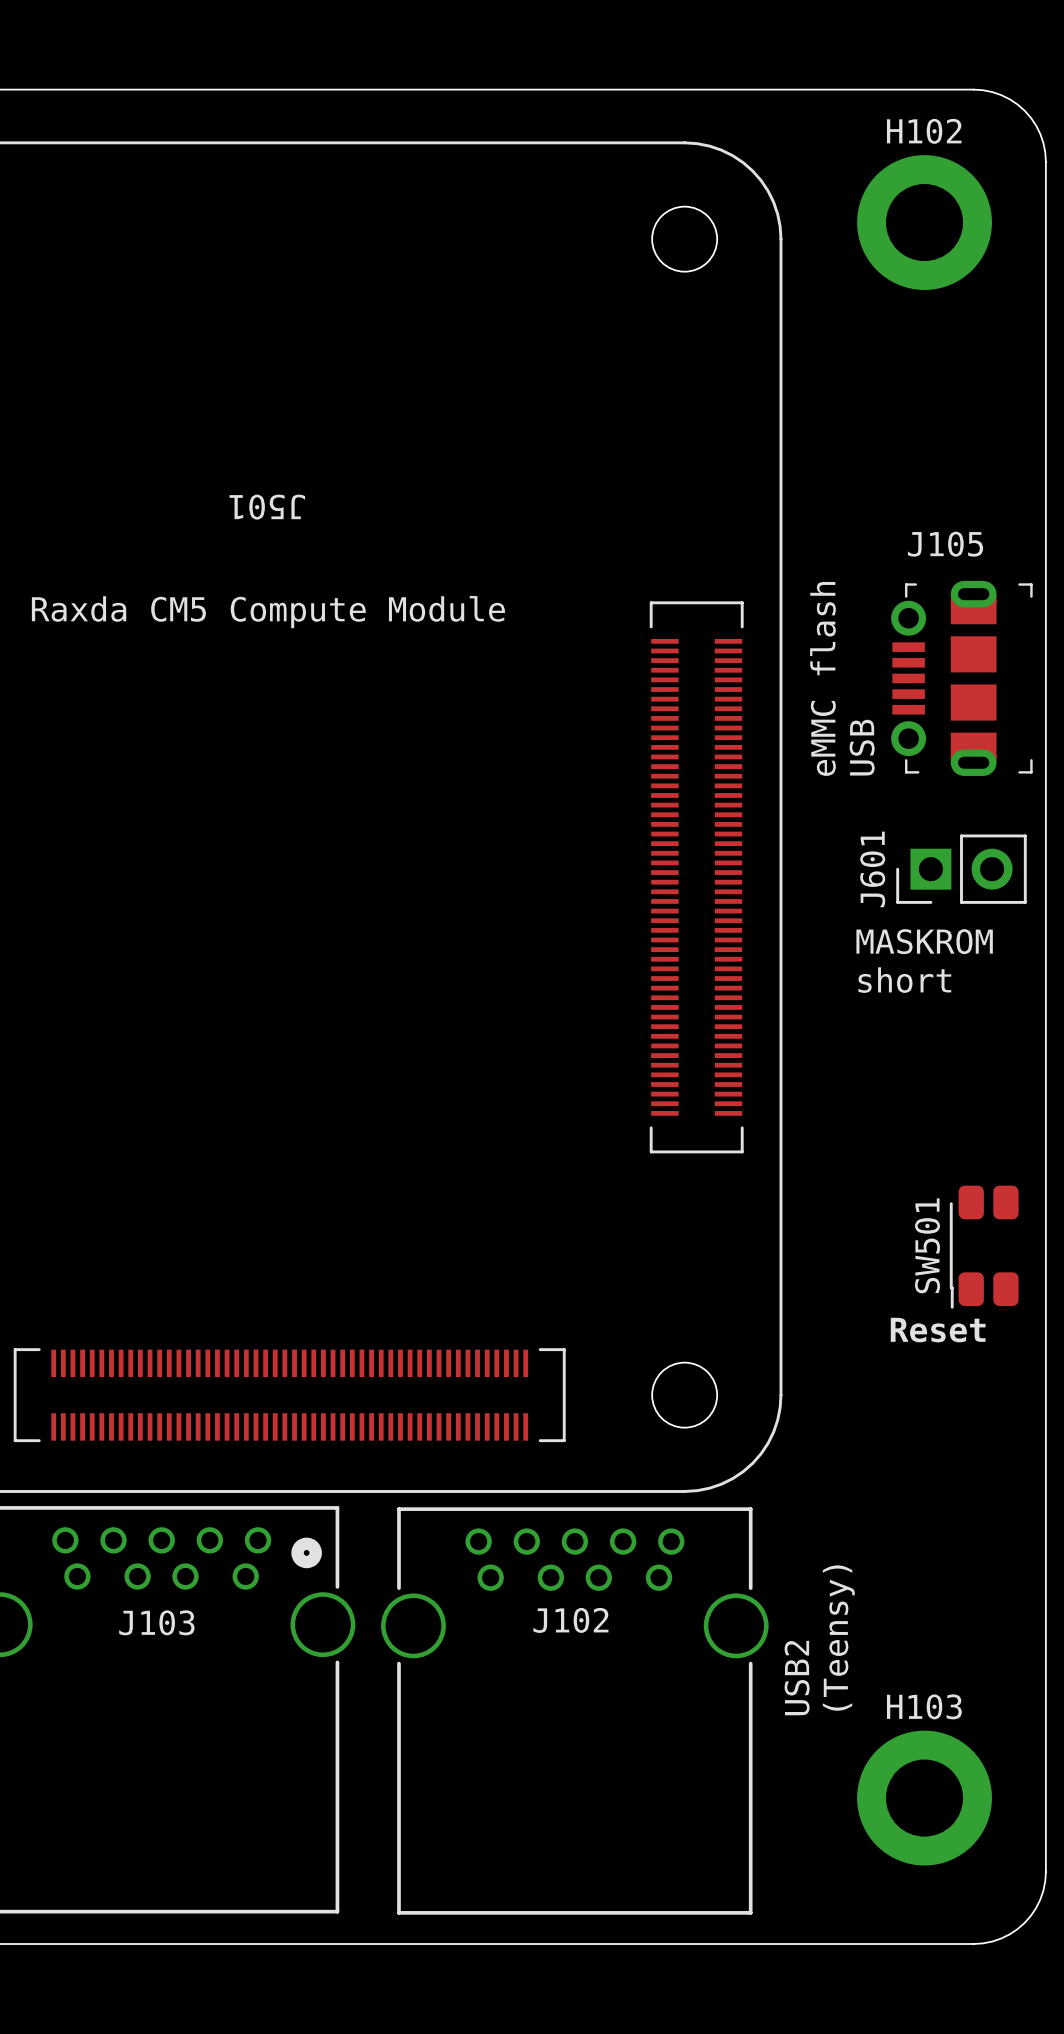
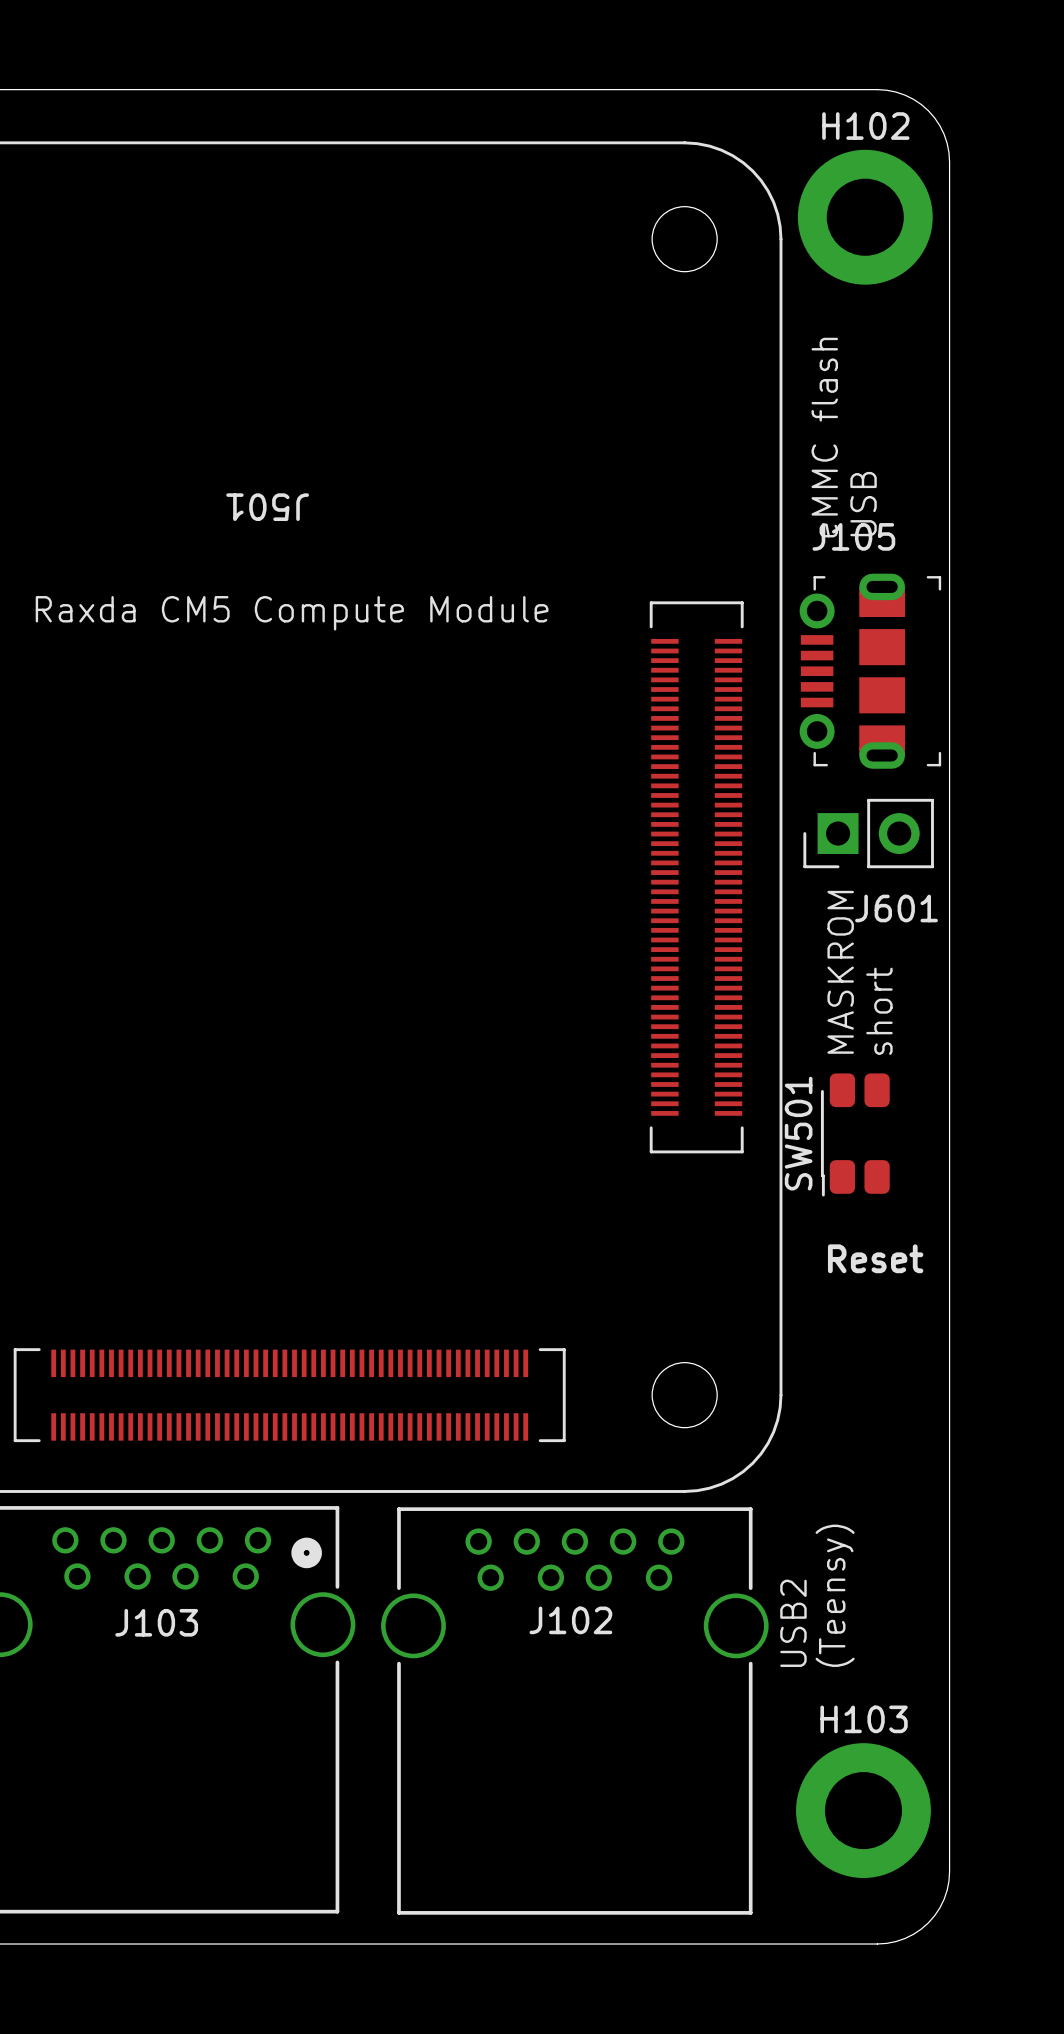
board edge: (877, 89) (973, 89) (1001, 95) (1017, 104) (1030, 117) (1040, 134) (1045, 161) (1045, 1881) (1040, 1899) (1030, 1915) (1017, 1929) (1001, 1938) (973, 1944) (877, 1944) -> (877, 89) (904, 95) (928, 110) (944, 134) (949, 161) (949, 1871) (944, 1899) (928, 1922) (904, 1938) (877, 1944)
H102 position: (924, 222) -> (865, 217)
text position: eMMC flash (822, 678) -> eMMC flash (824, 437)
J105 position: (961, 678) -> (870, 671)
text position: USB (862, 747) -> USB (863, 504)
J601 name rotation: 0° (872, 869) -> 90° clockwise (896, 908)
J601 position: (961, 869) -> (868, 833)
text rotation: 0° (924, 941) -> 90° counterclockwise (840, 972)
text rotation: 0° (904, 980) -> 90° counterclockwise (879, 1011)
SW501 position: (984, 1247) -> (855, 1134)
text position: Reset (938, 1330) -> Reset (875, 1258)
text position: (Teensy) (838, 1638) -> (Teensy) (835, 1595)
text position: USB2 (797, 1678) -> USB2 (793, 1623)
H103 position: (924, 1798) -> (863, 1810)

